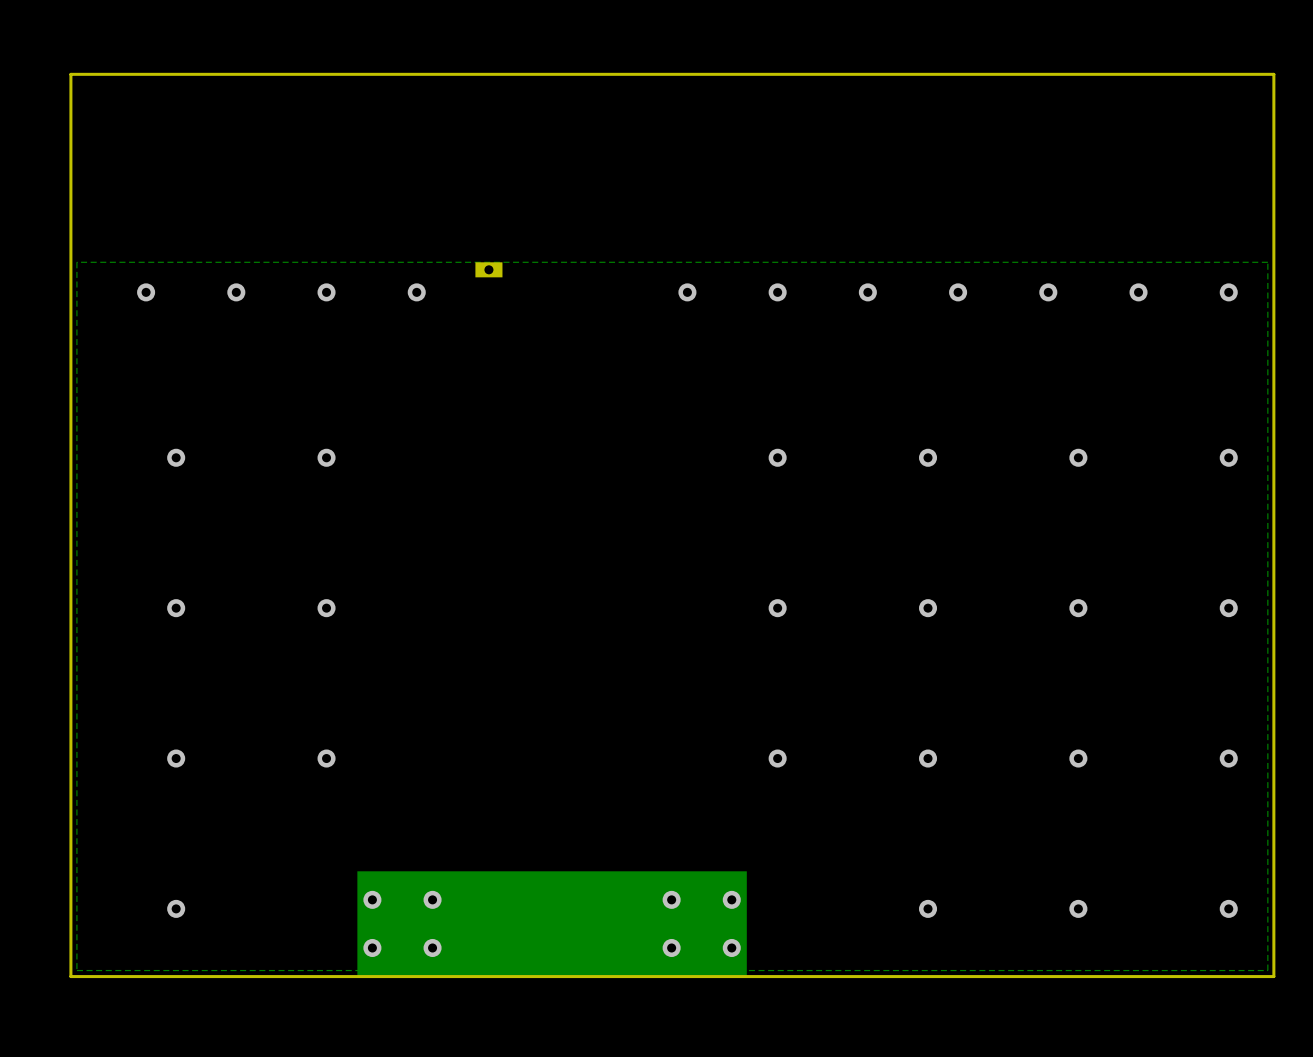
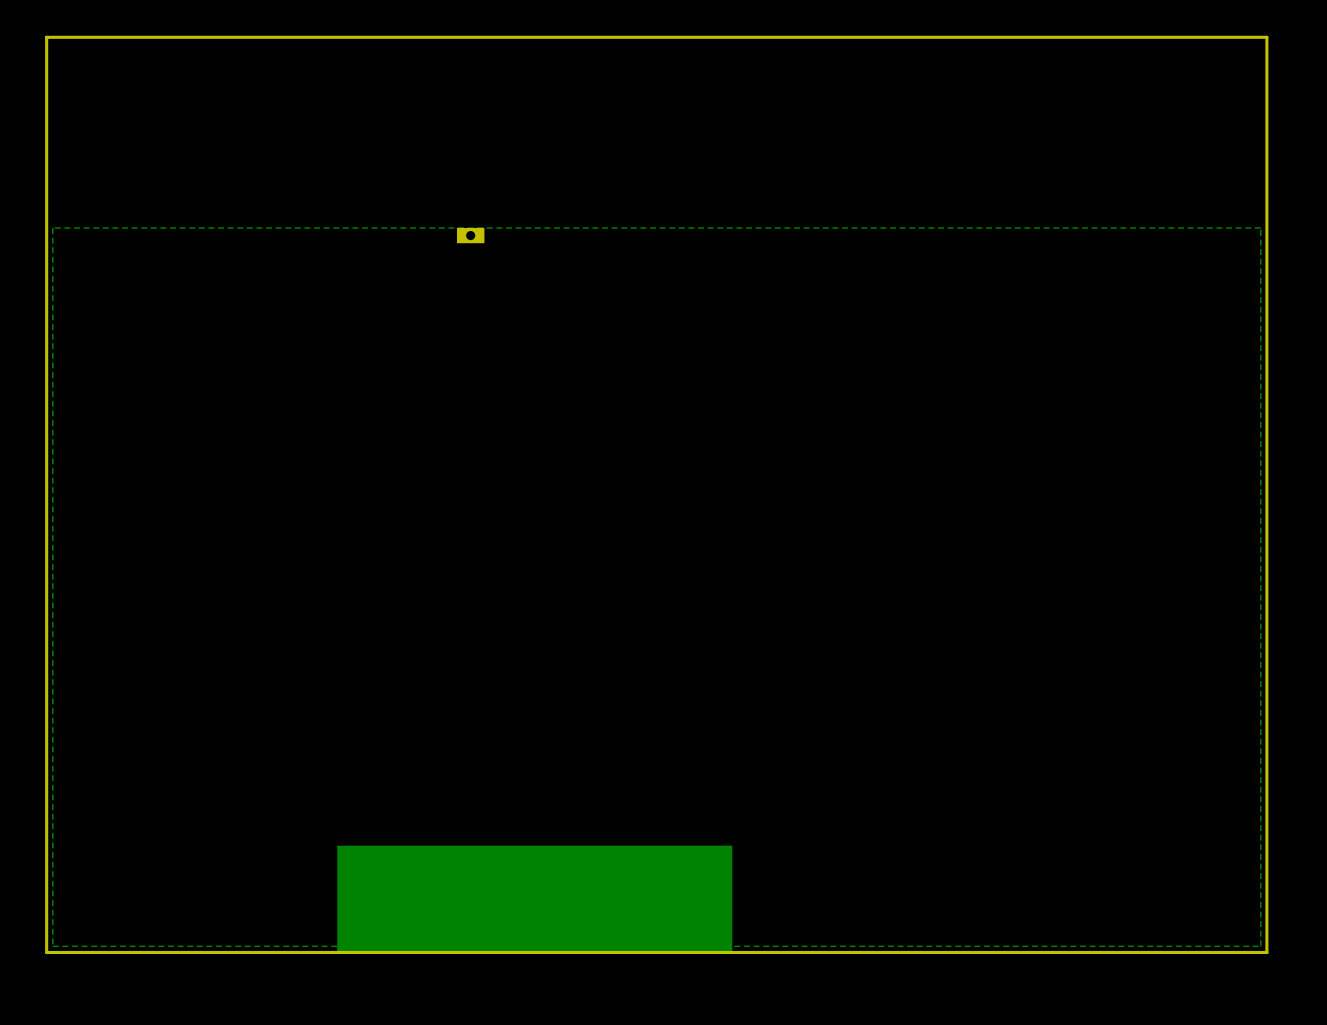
via: (146, 292) -> none
via: (236, 292) -> none
via: (326, 292) -> none
via: (416, 292) -> none
via: (687, 292) -> none
via: (777, 292) -> none
via: (867, 292) -> none
via: (958, 292) -> none
via: (1048, 292) -> none
via: (1138, 292) -> none
via: (1228, 292) -> none
via: (176, 457) -> none
via: (326, 457) -> none
via: (777, 457) -> none
via: (928, 457) -> none
via: (1078, 457) -> none
via: (1228, 457) -> none
via: (176, 608) -> none
via: (326, 608) -> none
via: (777, 608) -> none
via: (928, 608) -> none
via: (1078, 608) -> none
via: (1228, 608) -> none
via: (176, 758) -> none
via: (326, 758) -> none
via: (777, 758) -> none
via: (928, 758) -> none
via: (1078, 758) -> none
via: (1228, 758) -> none
via: (372, 899) -> none
via: (432, 899) -> none
via: (671, 899) -> none
via: (731, 899) -> none
via: (176, 908) -> none
via: (928, 908) -> none
via: (1078, 908) -> none
via: (1228, 908) -> none
via: (372, 947) -> none
via: (432, 947) -> none
via: (671, 947) -> none
via: (731, 947) -> none

